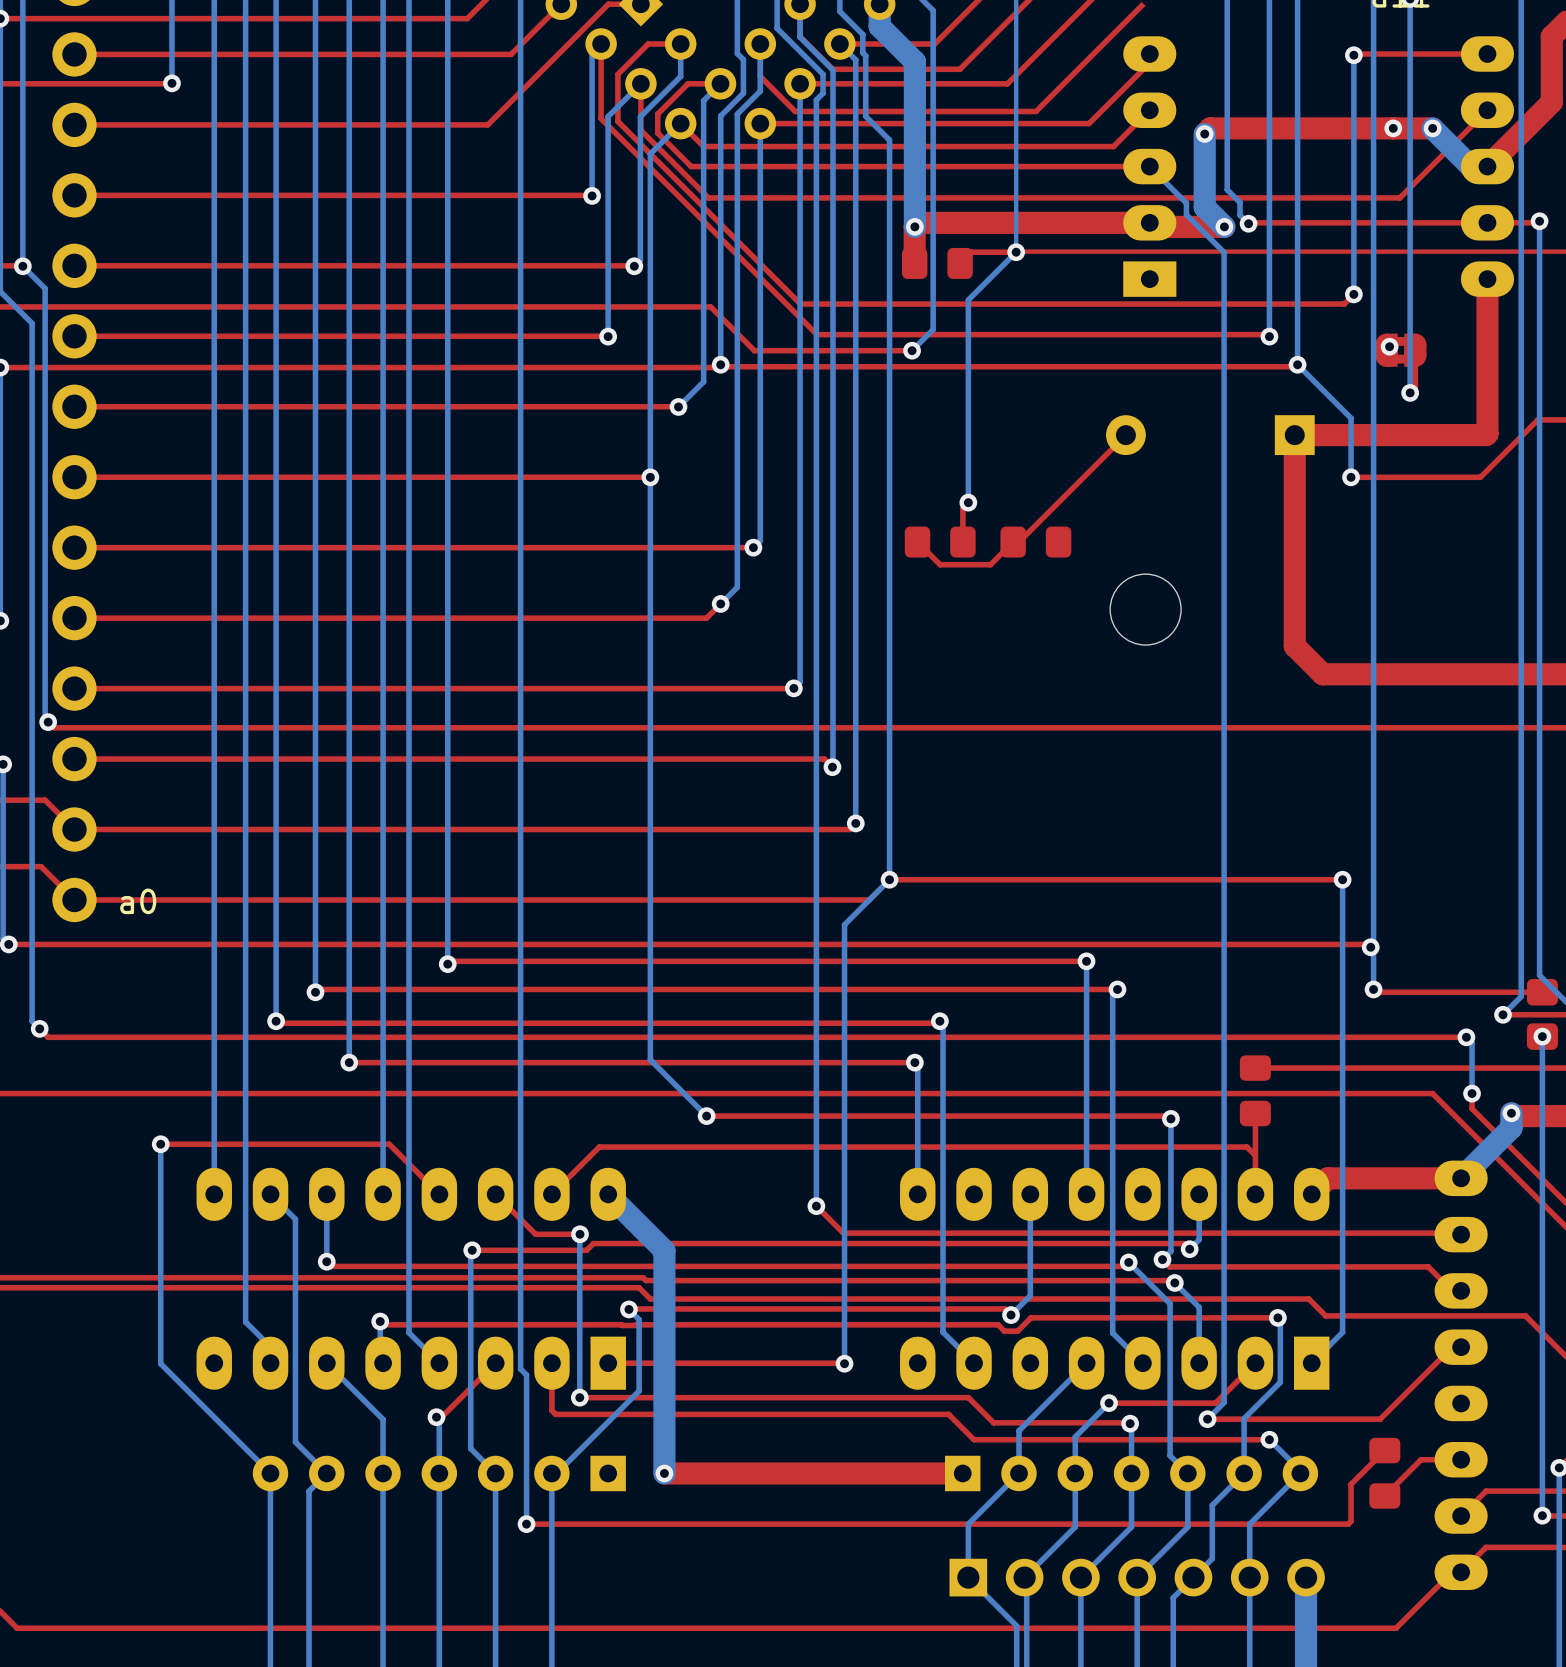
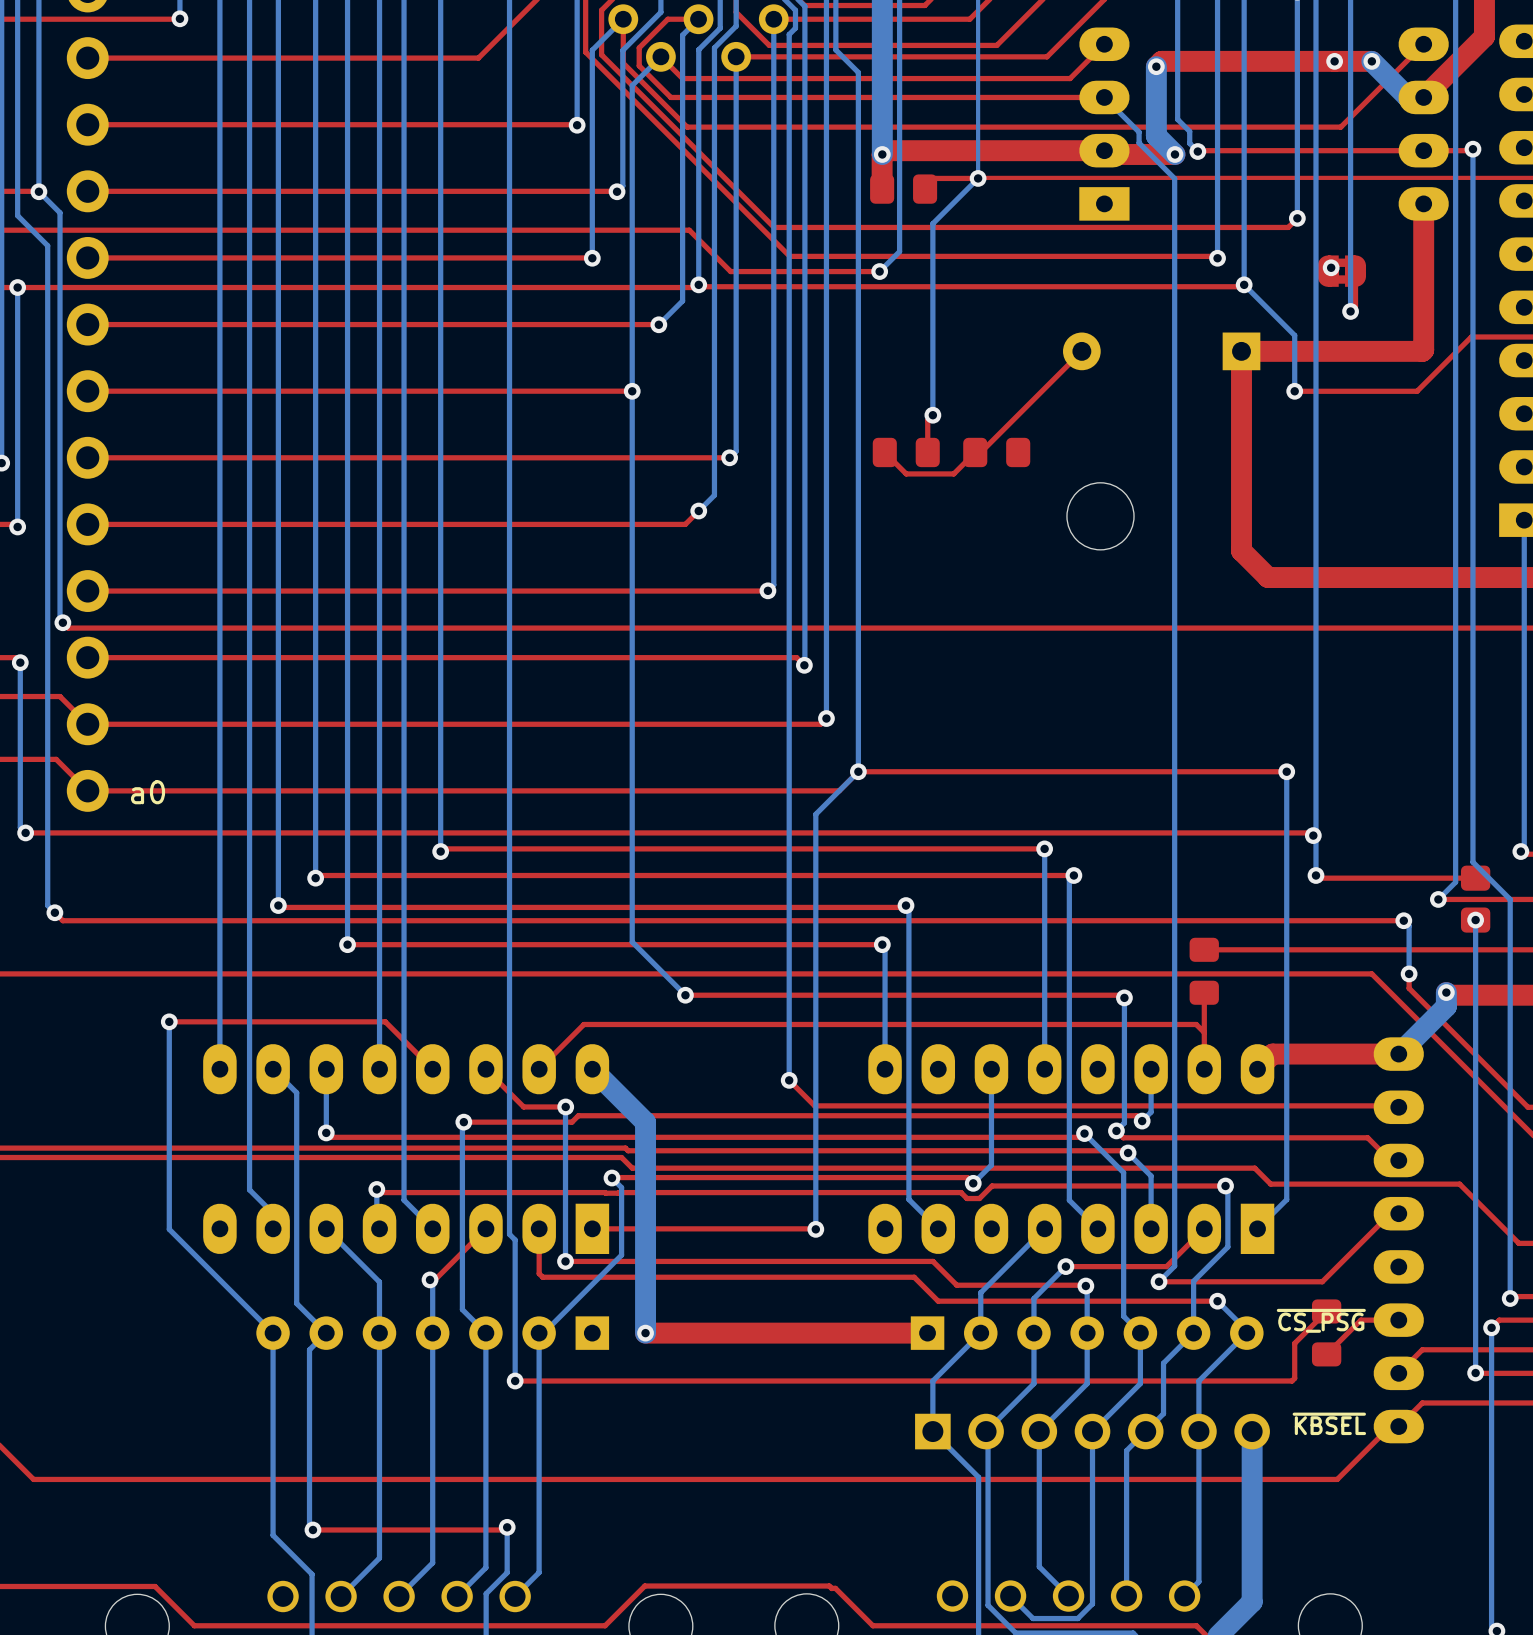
text: none -> ~{CS_PSG} (1321, 1320)
text: none -> ~{KBSEL} (1329, 1423)

